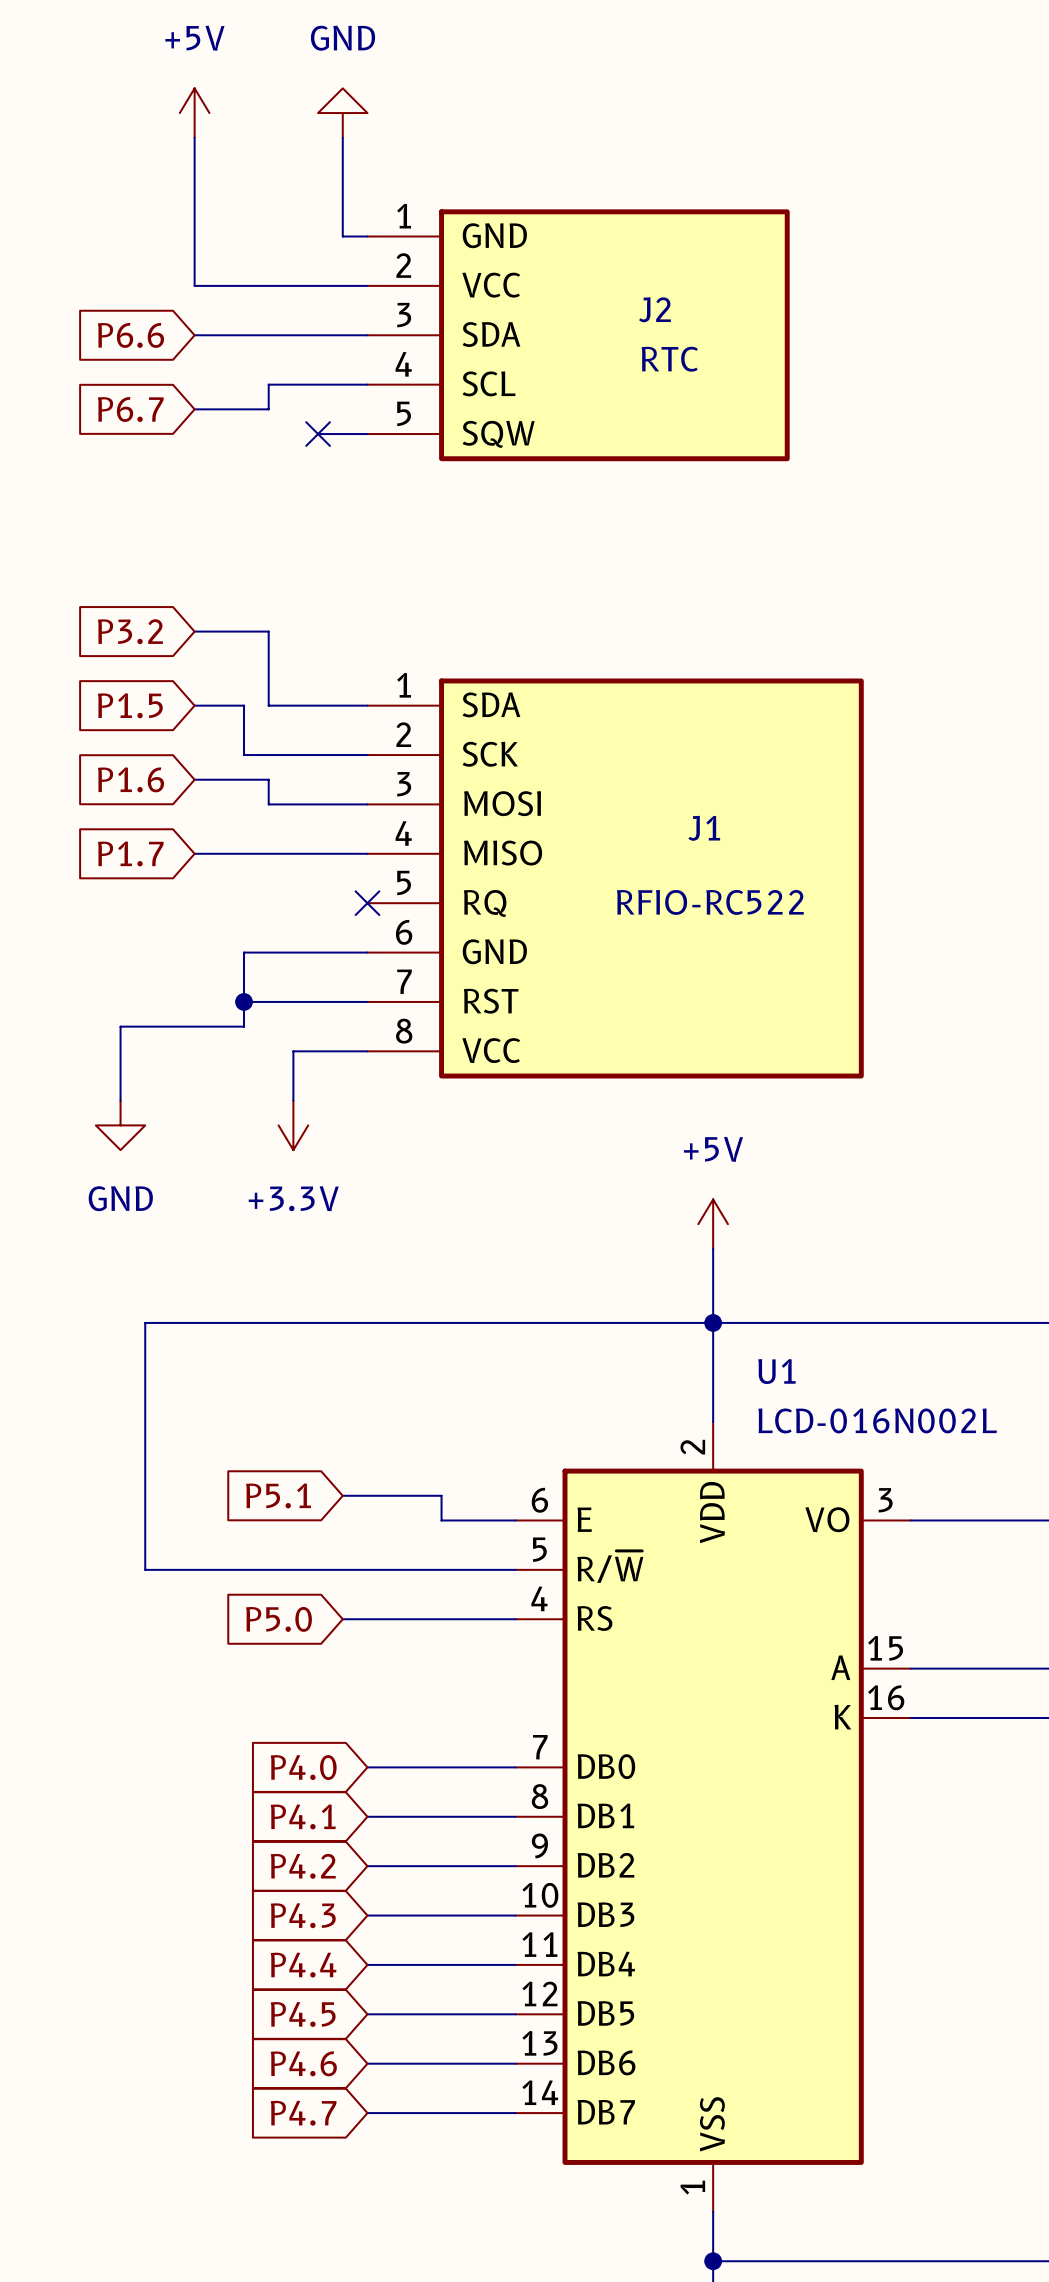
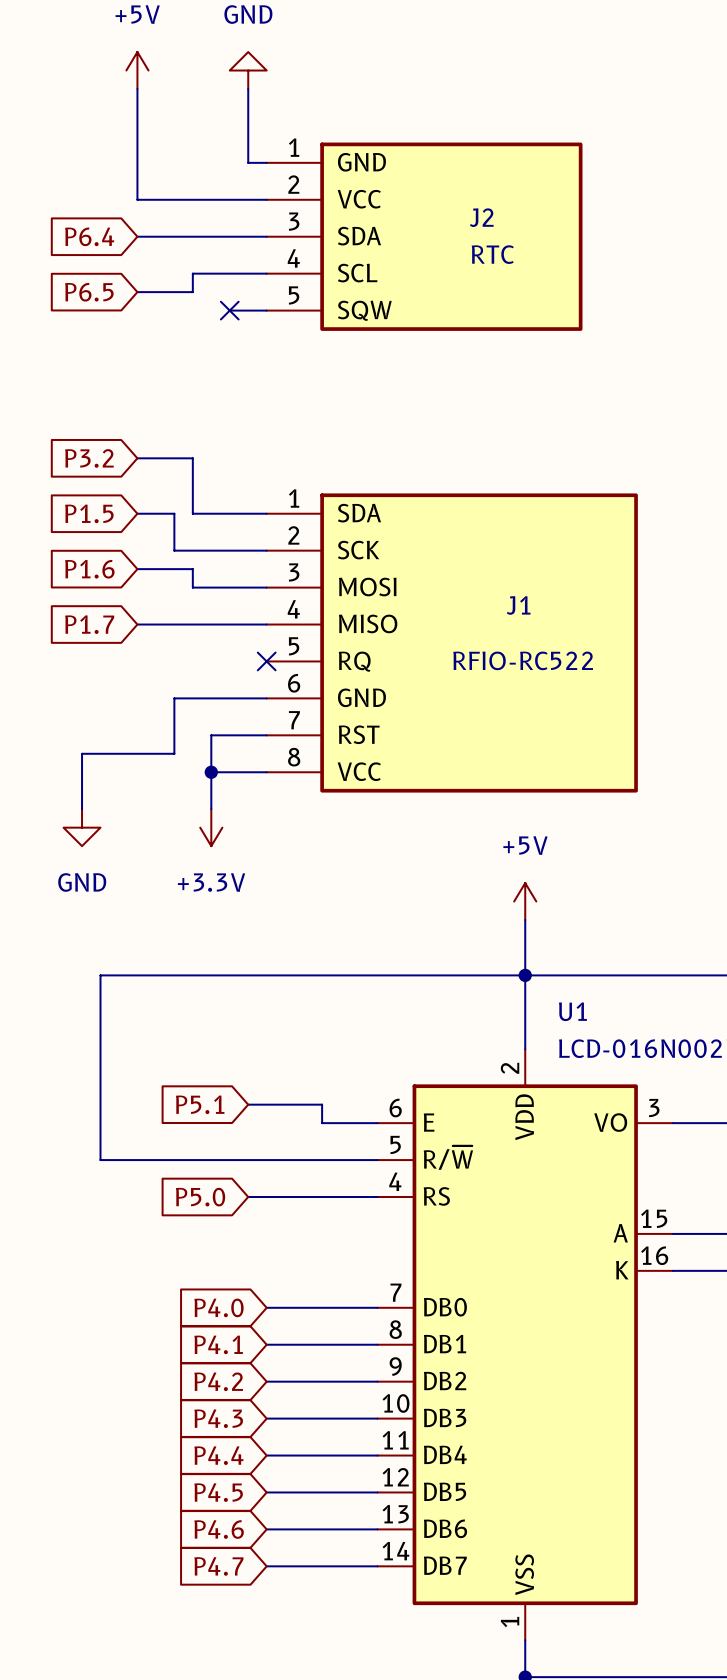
global label: P6.6 (130, 335) -> P6.4 (89, 236)
global label: P6.7 (130, 409) -> P6.5 (89, 292)
wire: (244, 1001) (293, 1001) -> (211, 772) (211, 735)
junction position: (244, 1001) -> (211, 772)

